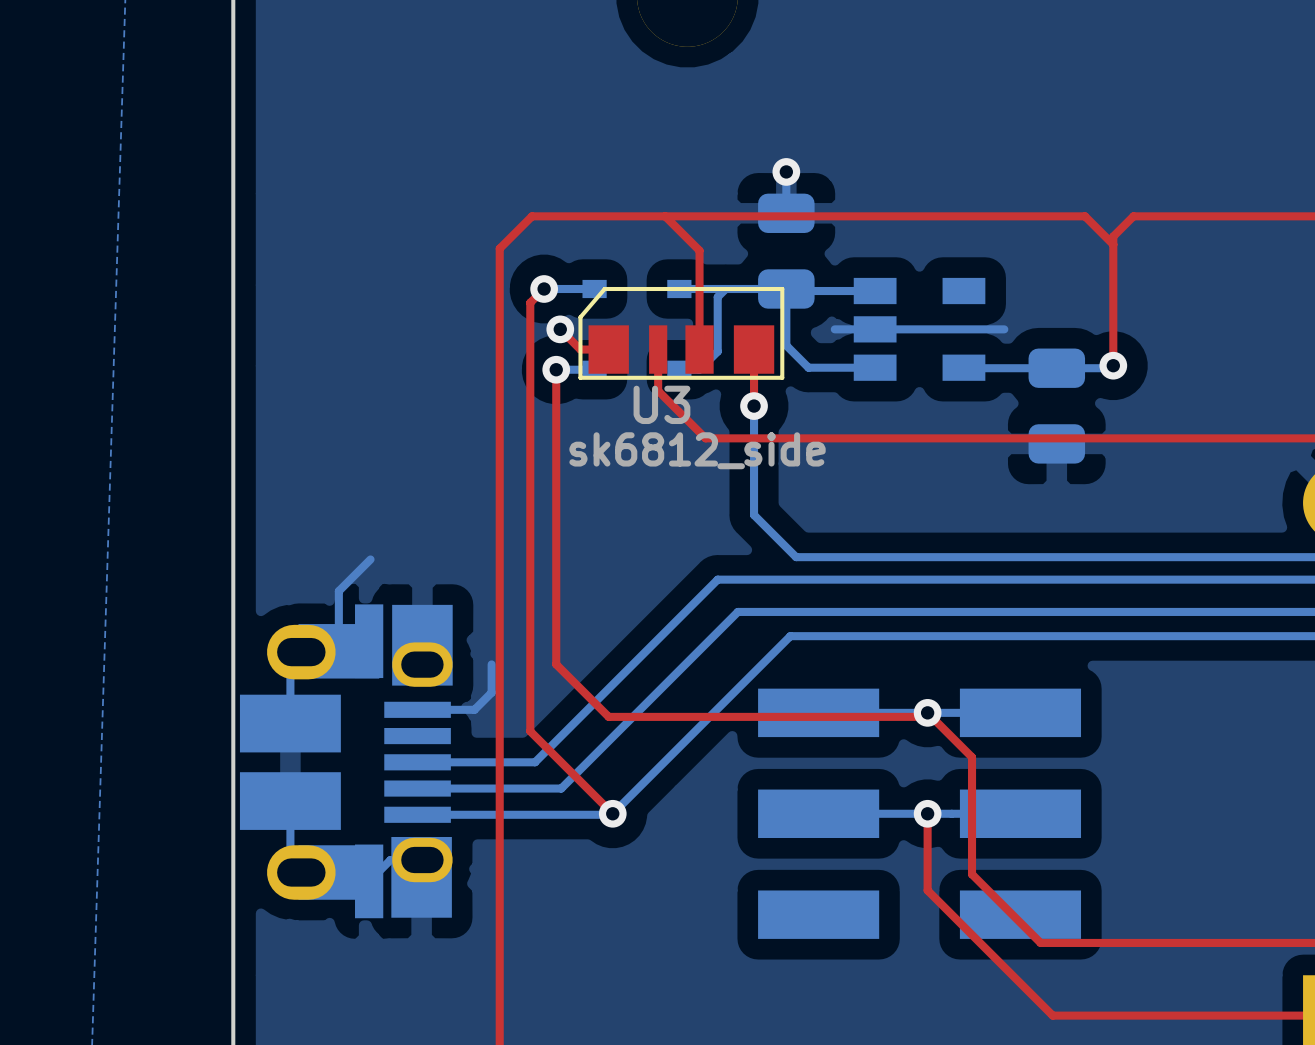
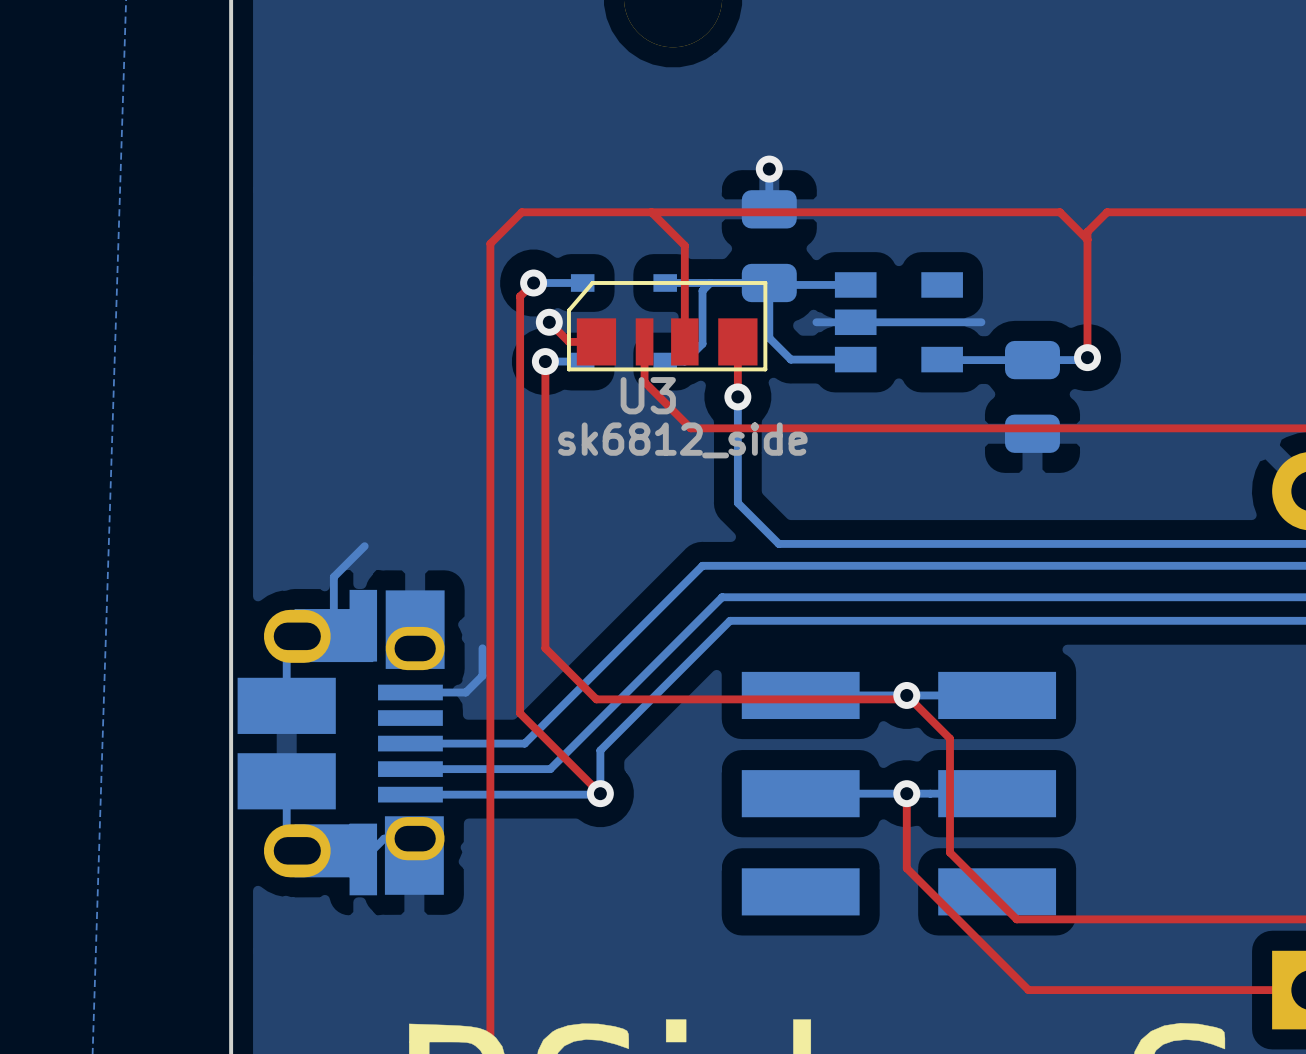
bottom track: (790, 636) (612, 813) -> (773, 620) (730, 620) (600, 750) (600, 793)

